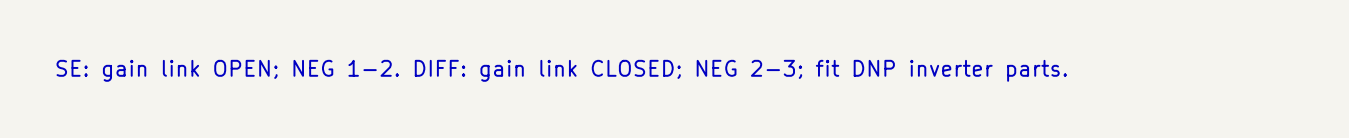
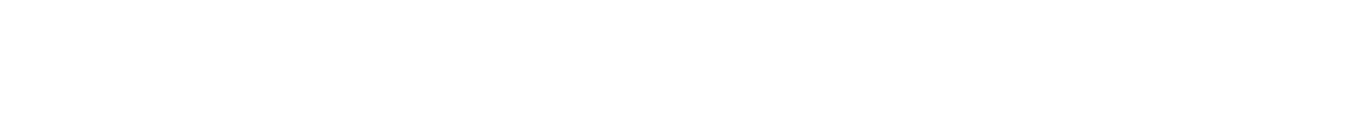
text: SE: gain link OPEN; NEG 1-2. DIFF: gain link CLOSED; NEG 2-3; fit DNP inverter parts. (561, 70) -> none

